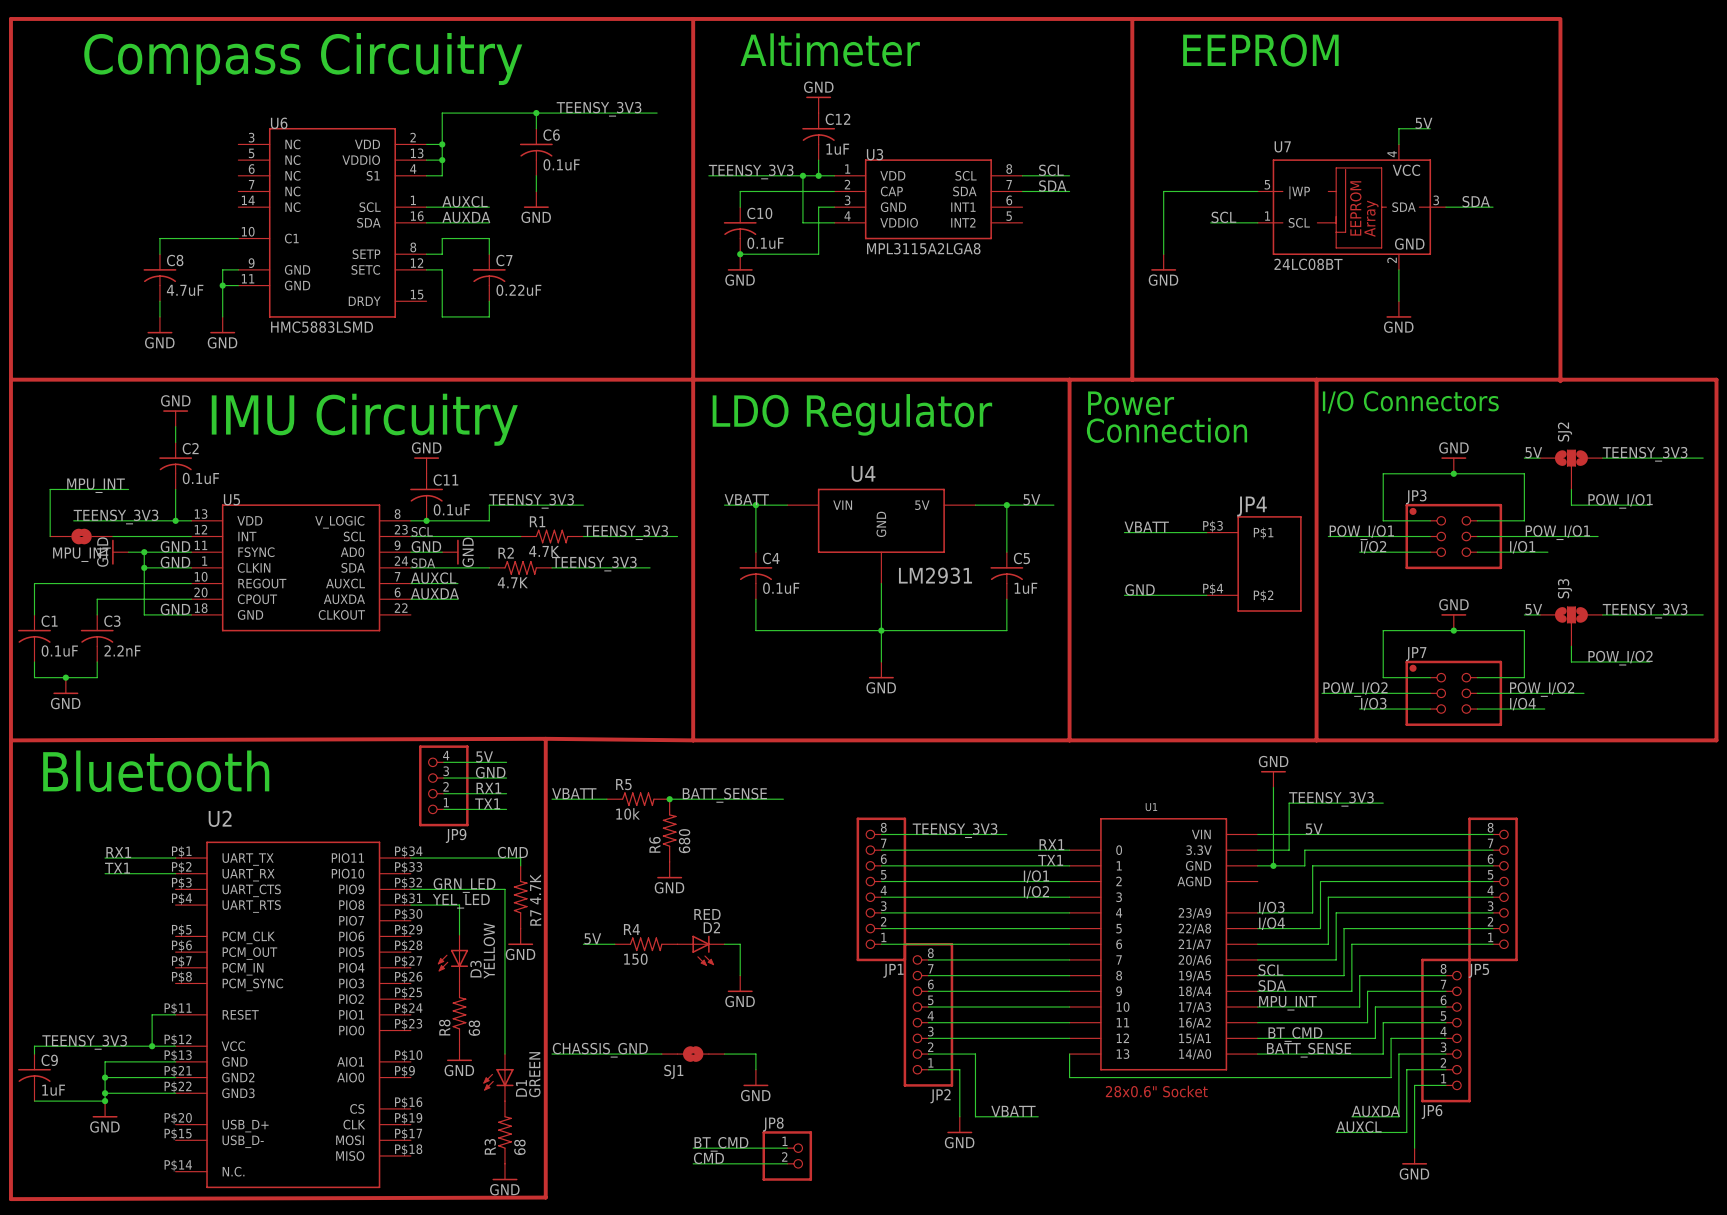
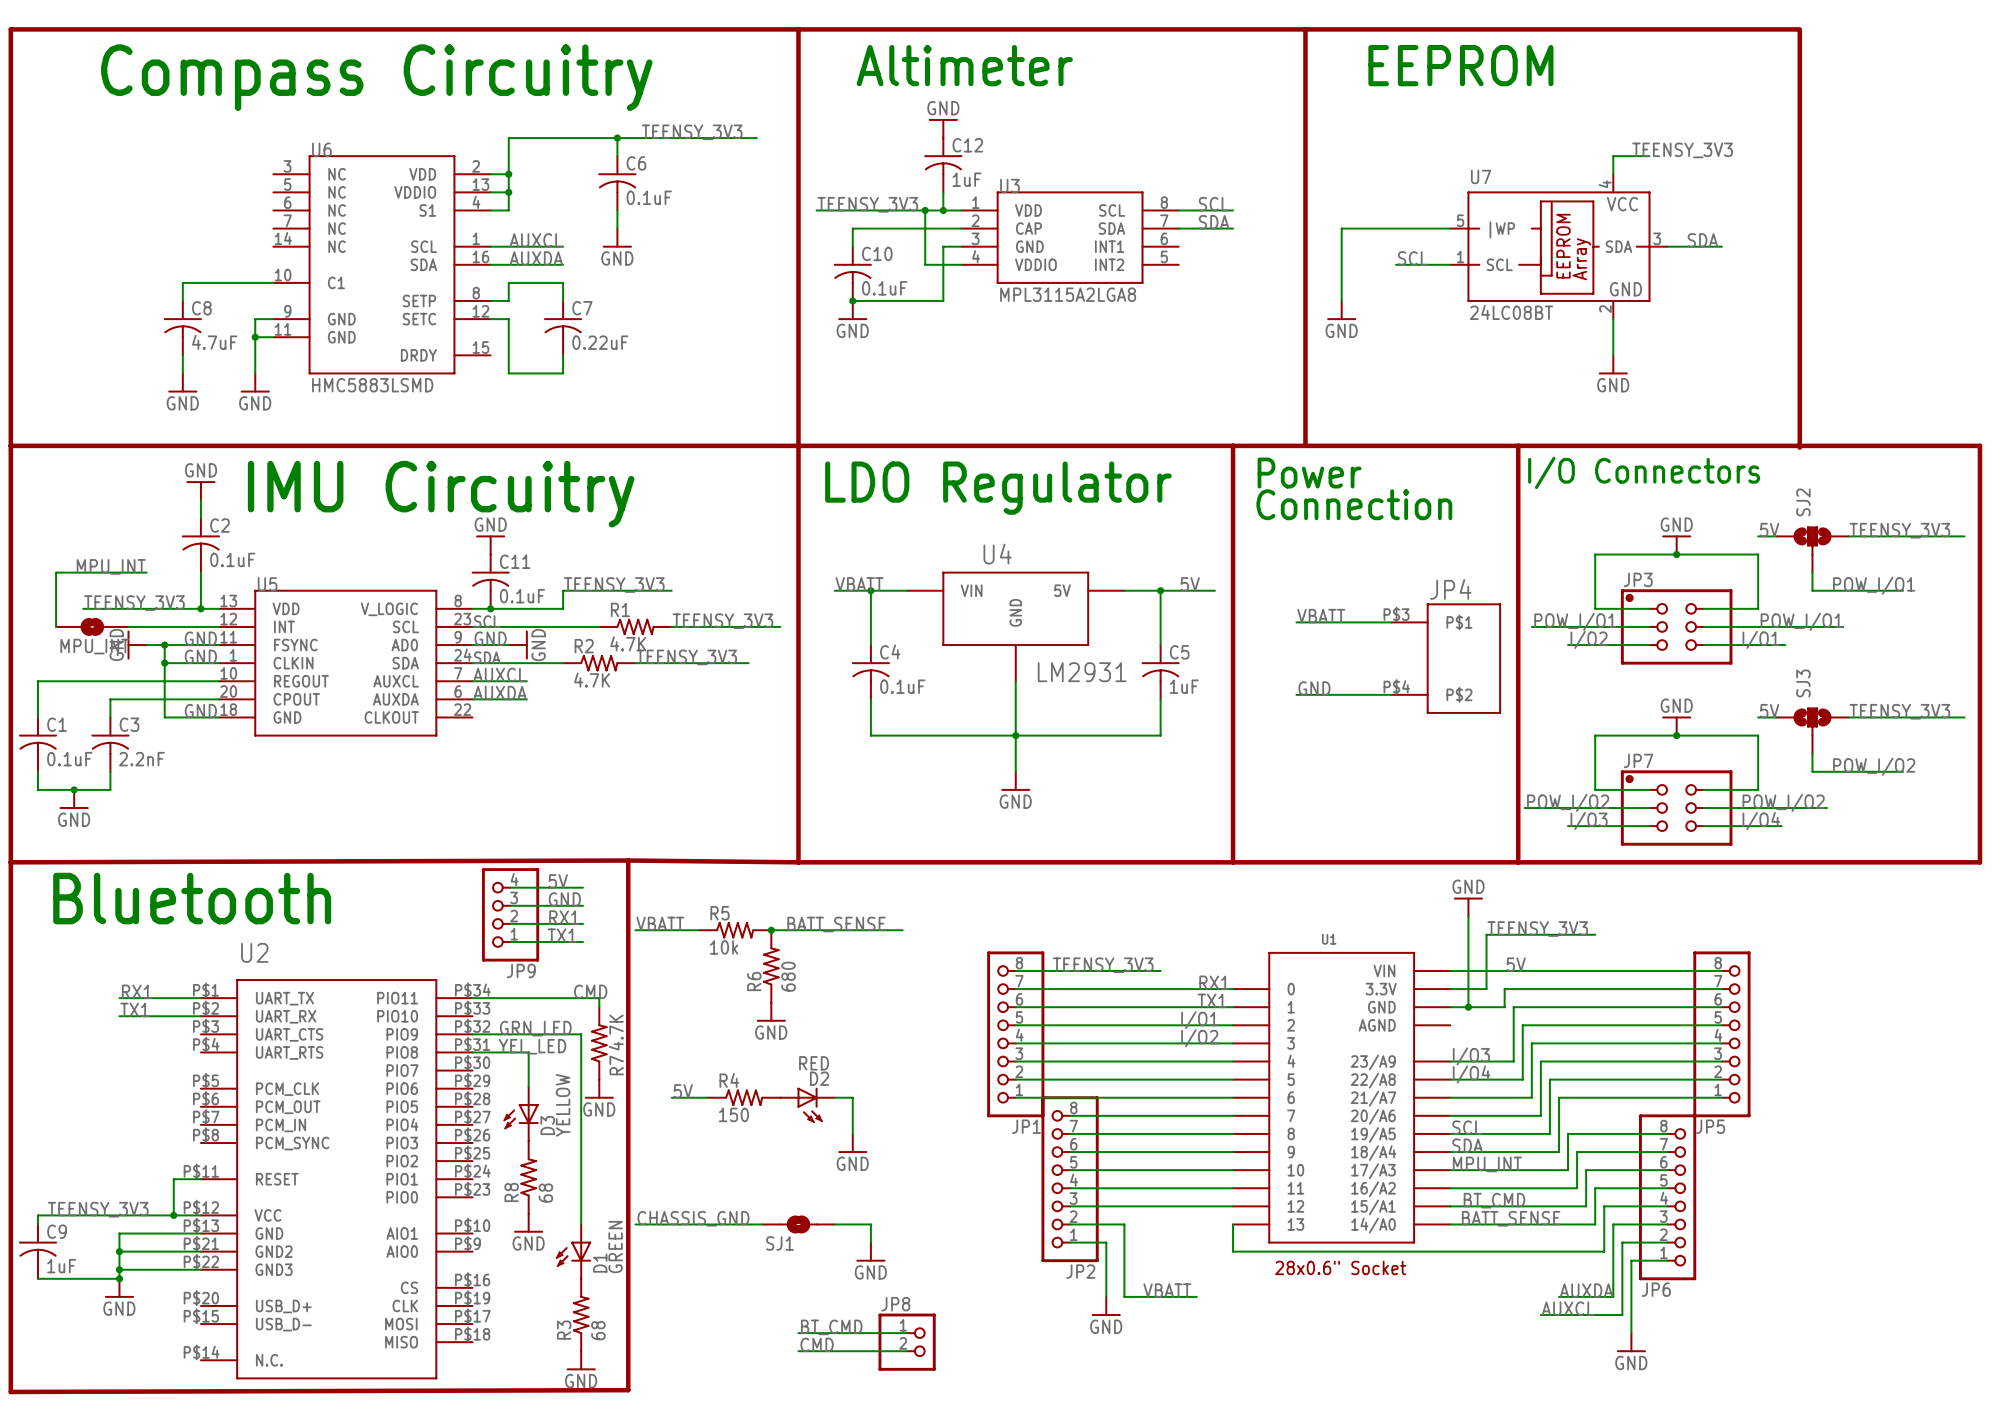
label: 5V (1424, 123) -> TEENSY_3V3 (1682, 150)

